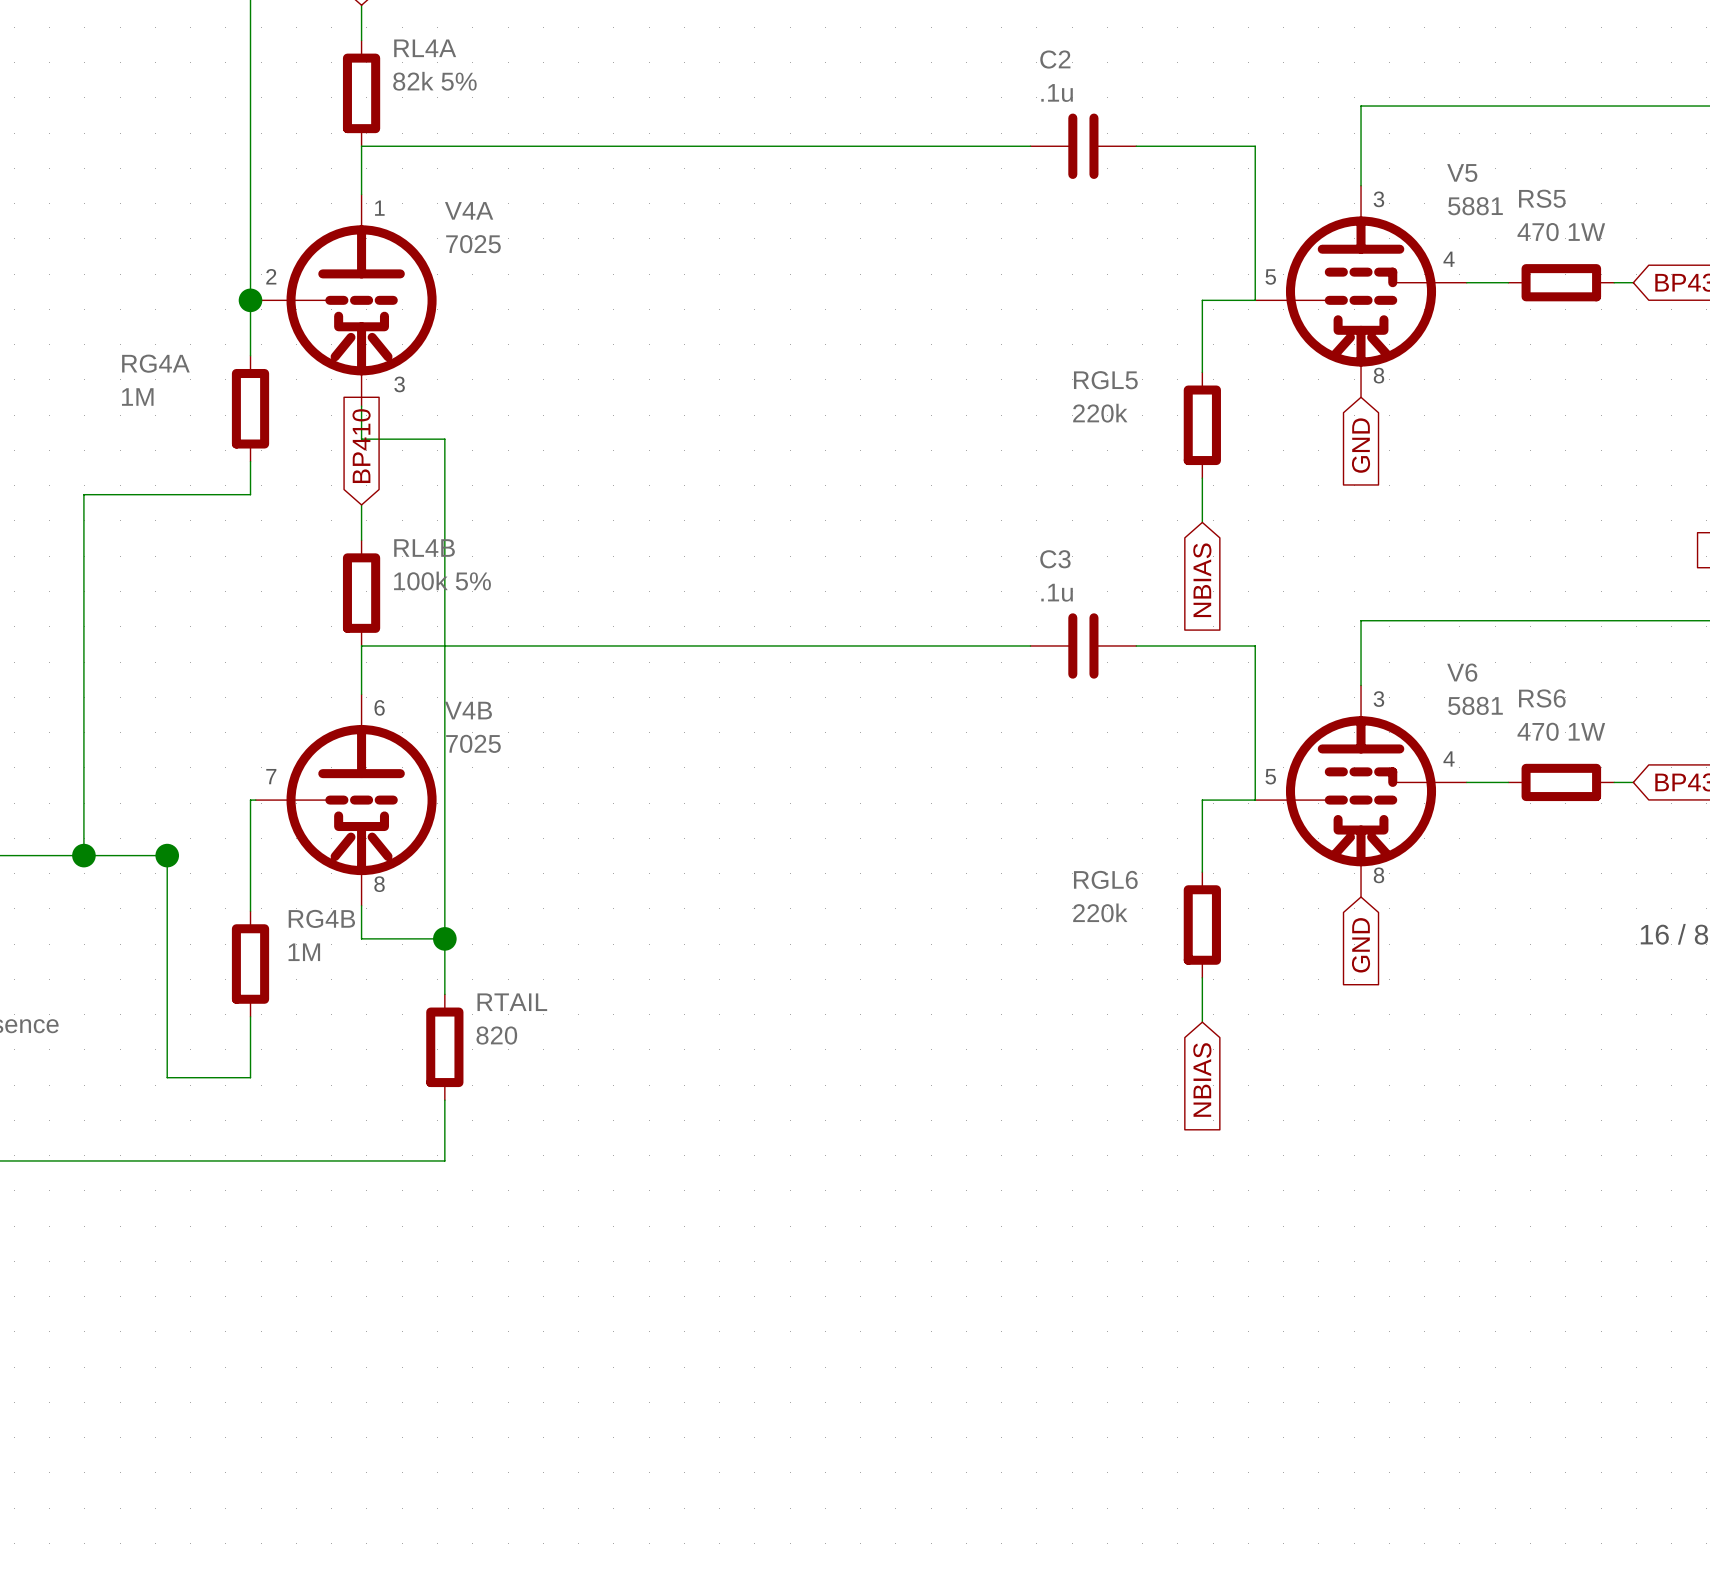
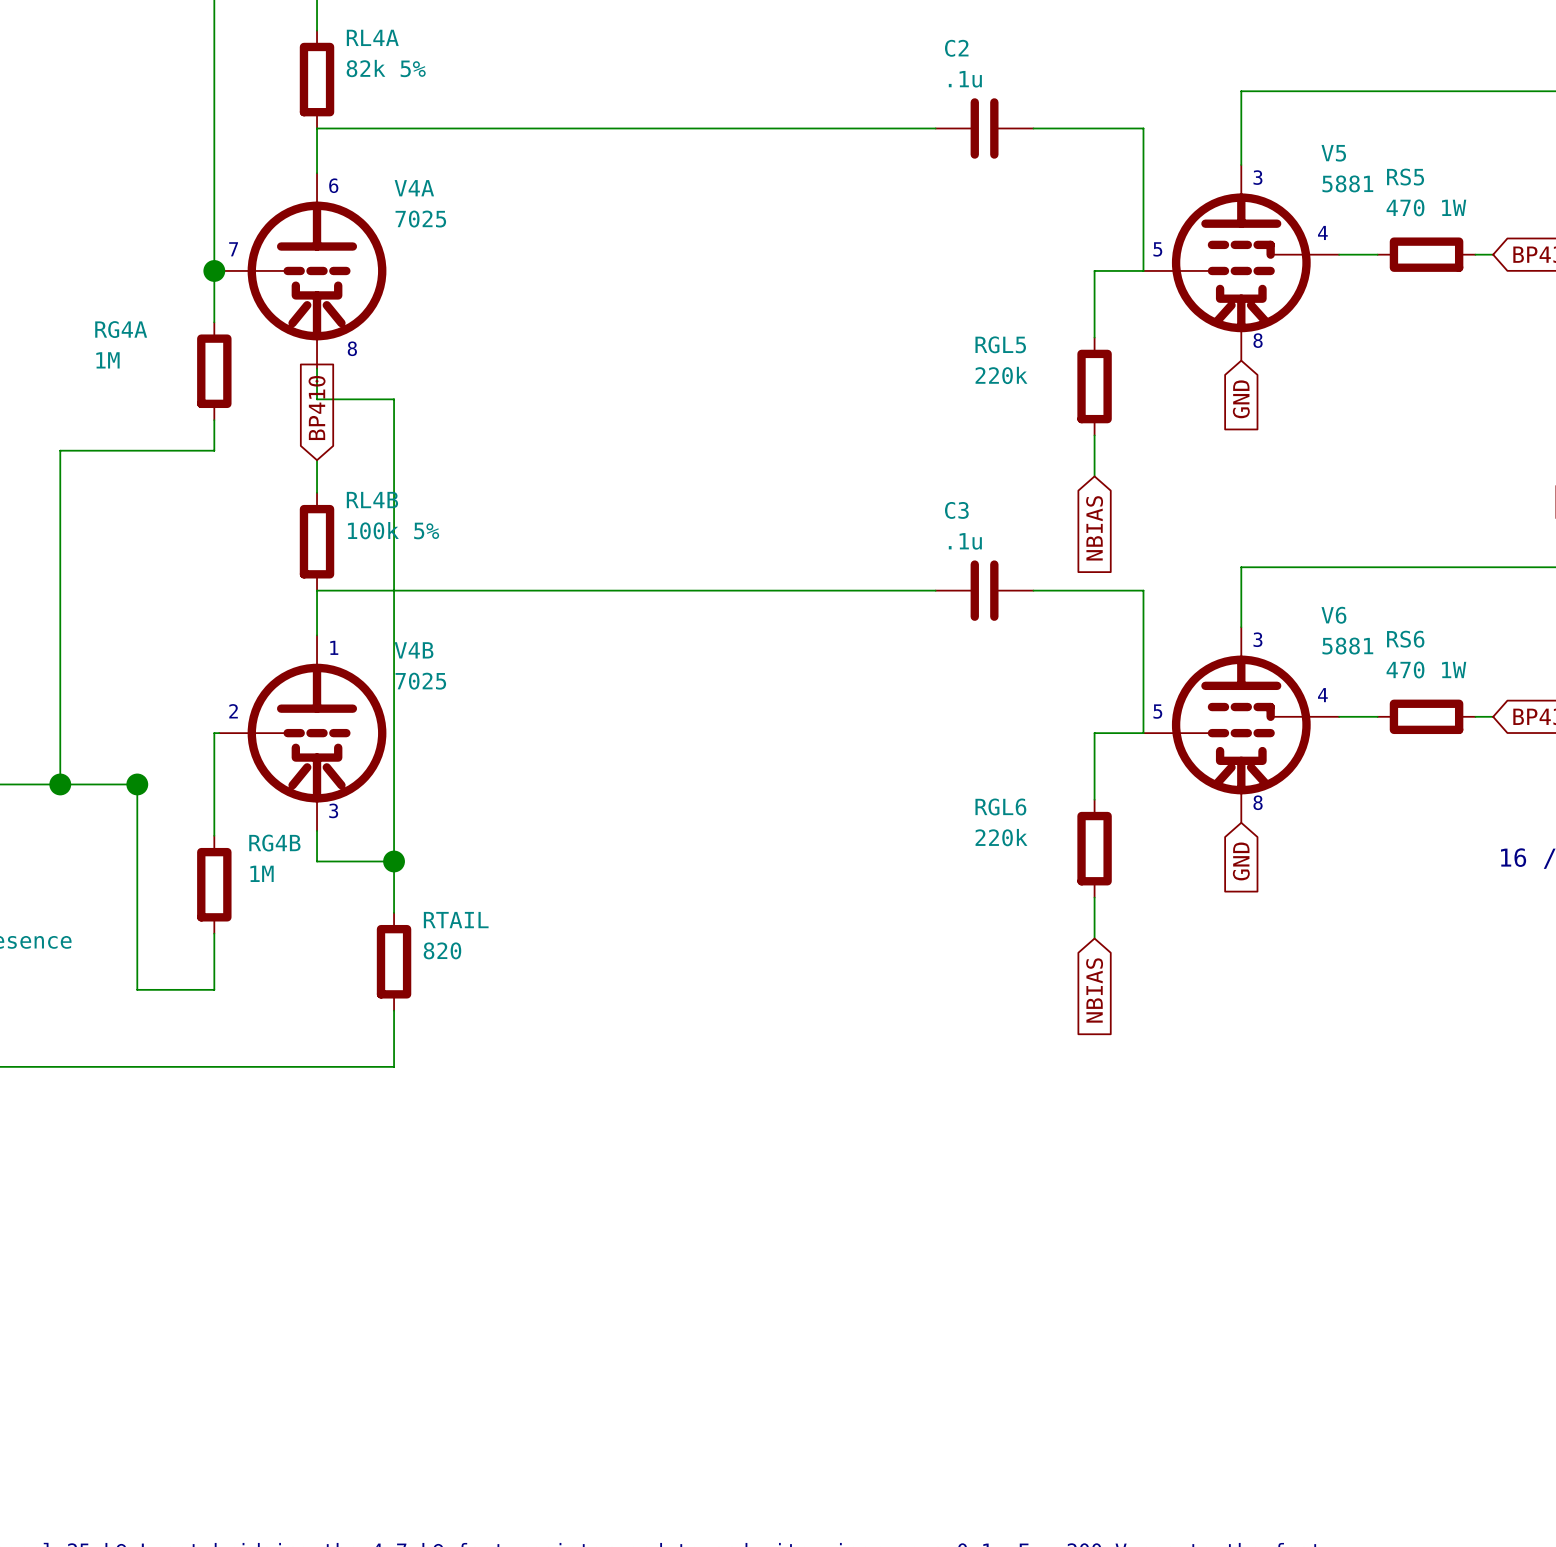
text: 1 (379, 208) -> 6 (333, 185)
text: 2 (271, 276) -> 7 (233, 249)
text: 3 (399, 384) -> 8 (352, 348)
text: 6 (379, 707) -> 1 (334, 647)
text: 7 (271, 776) -> 2 (233, 711)
text: 8 (379, 884) -> 3 (333, 810)

